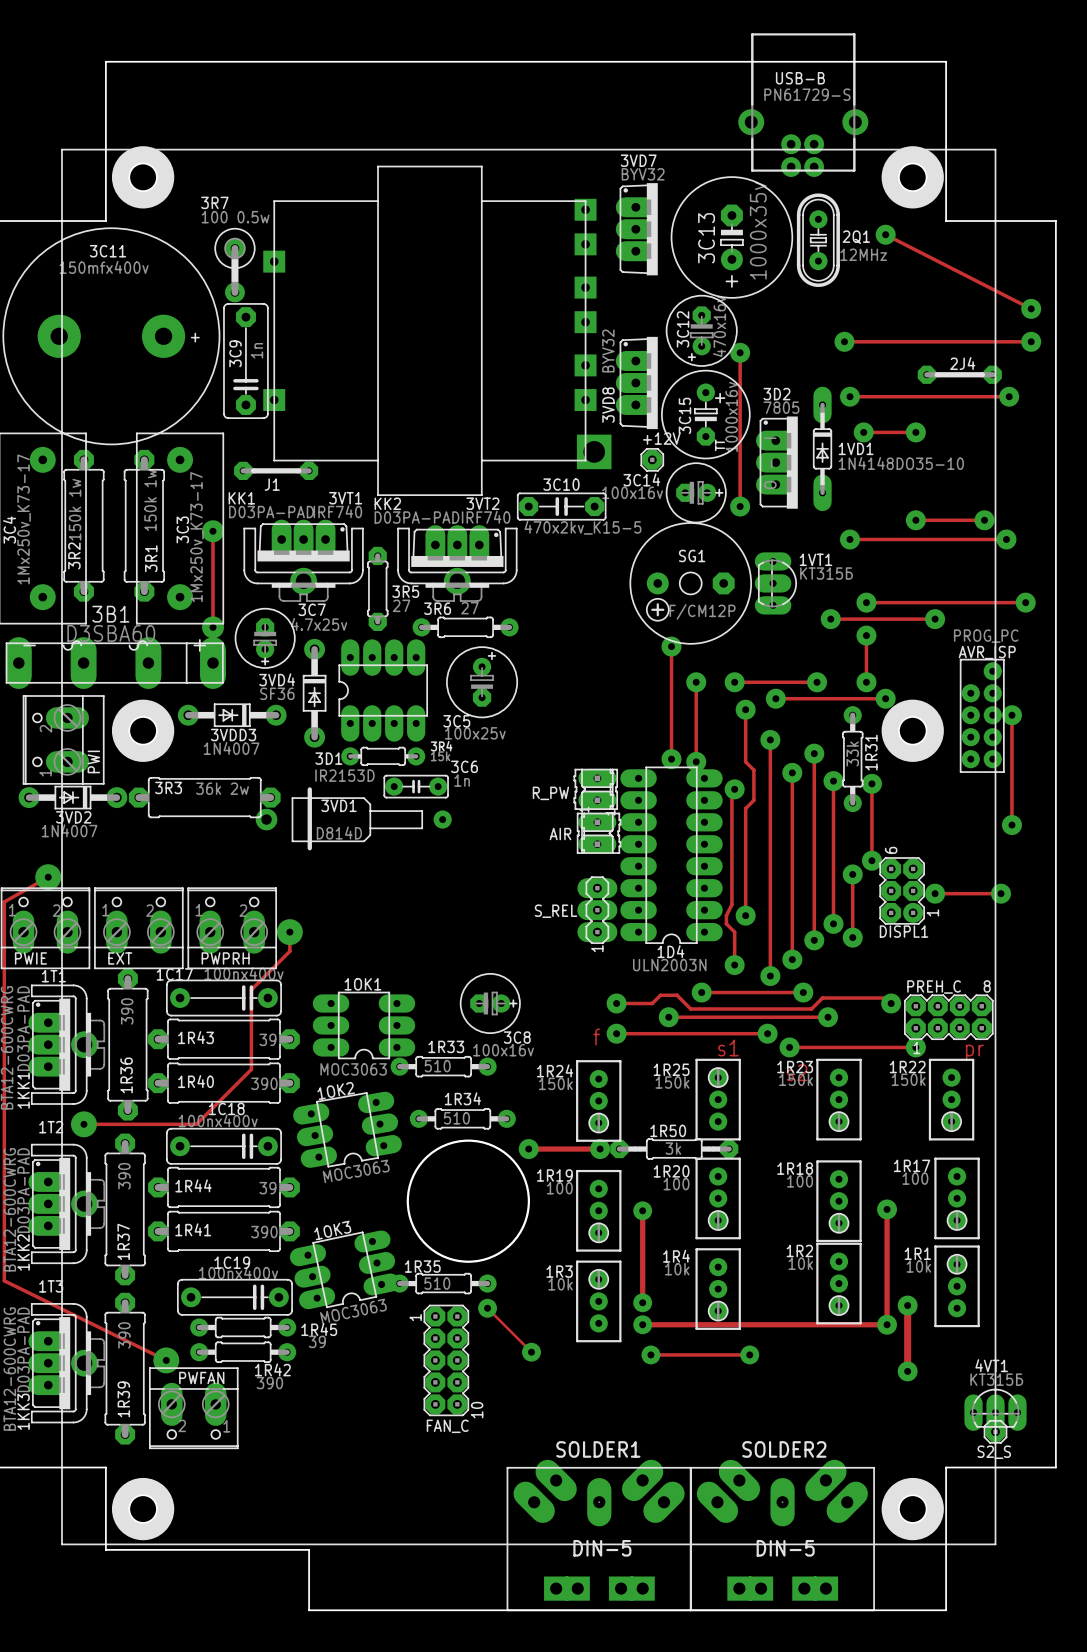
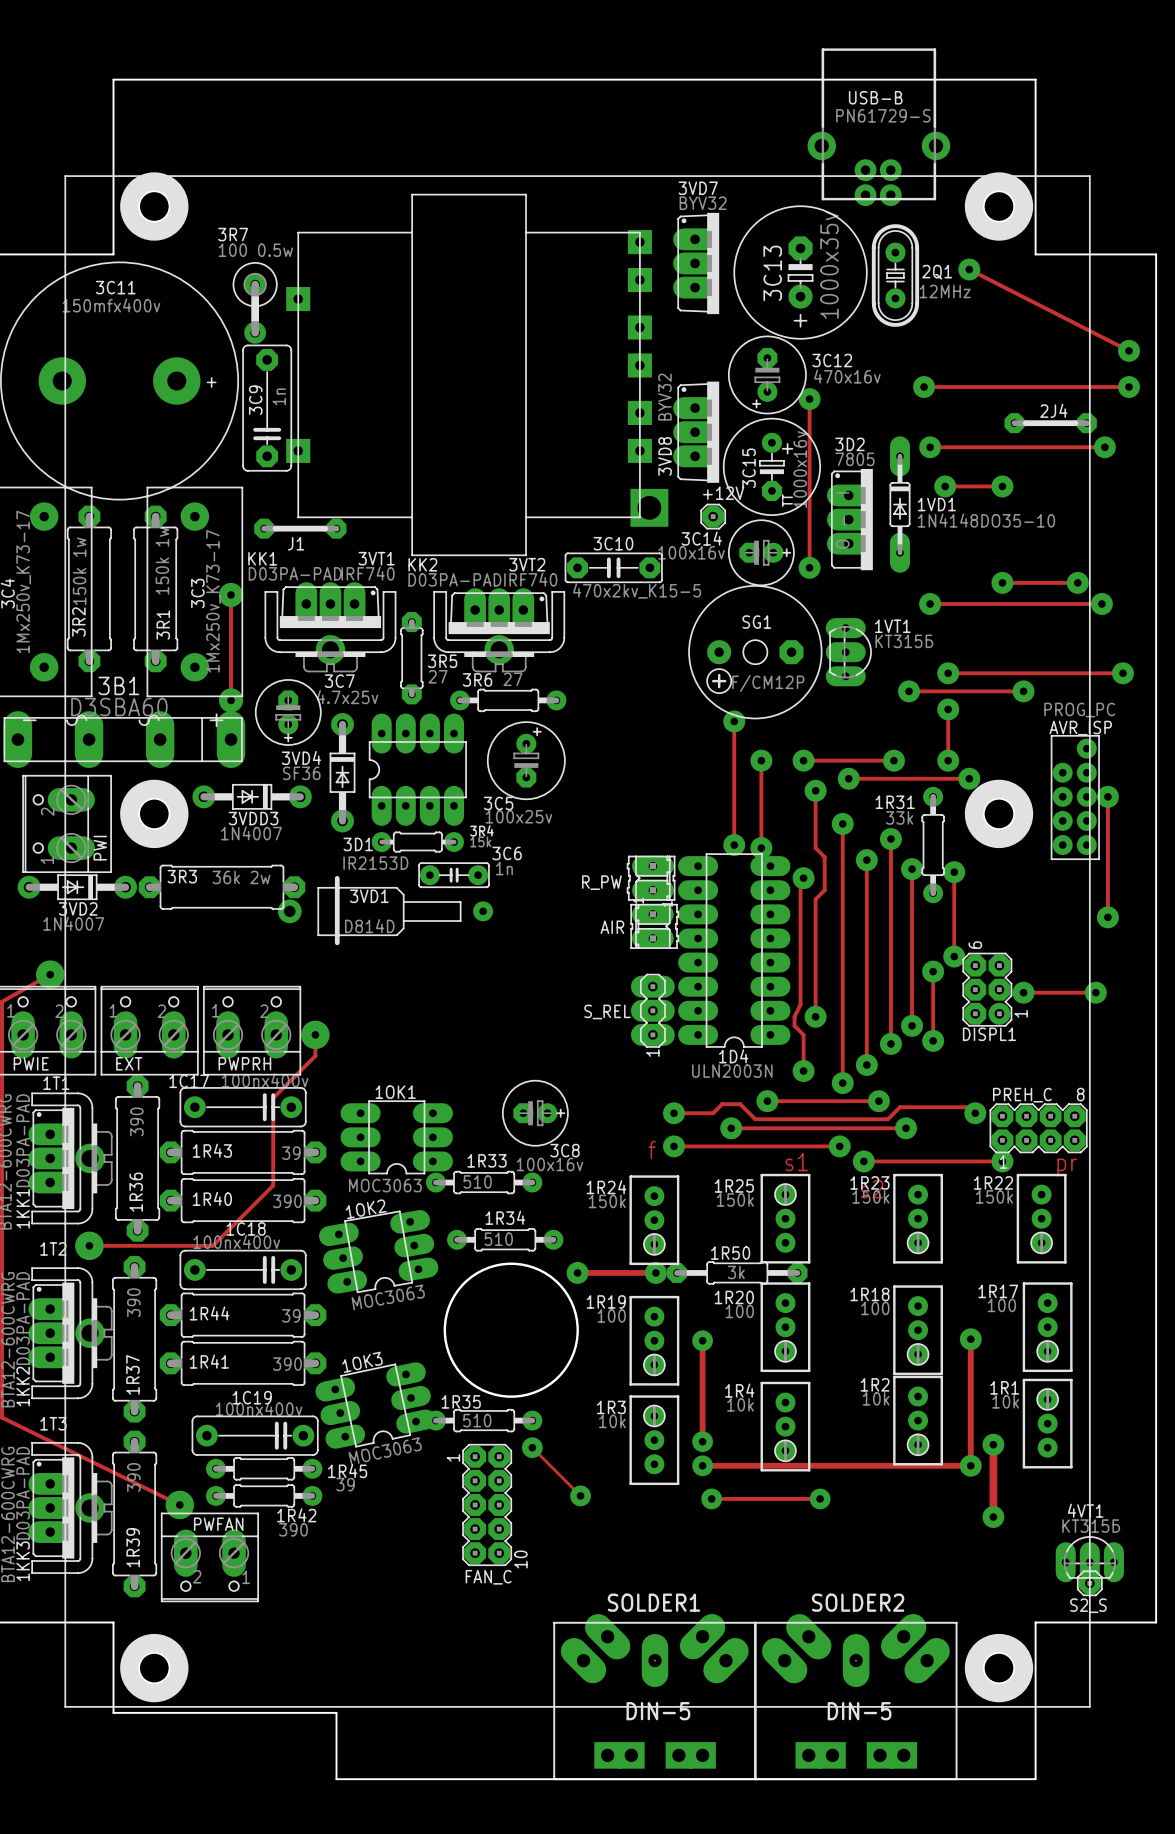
3C12 value rotation: 0° (719, 326) -> 90° clockwise (847, 376)
3C12 name rotation: 0° (683, 329) -> 90° clockwise (832, 360)
3C12 name position: 3C12 (683, 329) -> 3C12 (832, 360)
1R31 name rotation: 0° (871, 752) -> 90° clockwise (895, 802)
1R31 name position: 1R31 (871, 752) -> 1R31 (895, 802)
1R31 value rotation: 0° (852, 753) -> 90° clockwise (899, 817)
1R31 value position: 33k (852, 753) -> 33k (899, 817)

